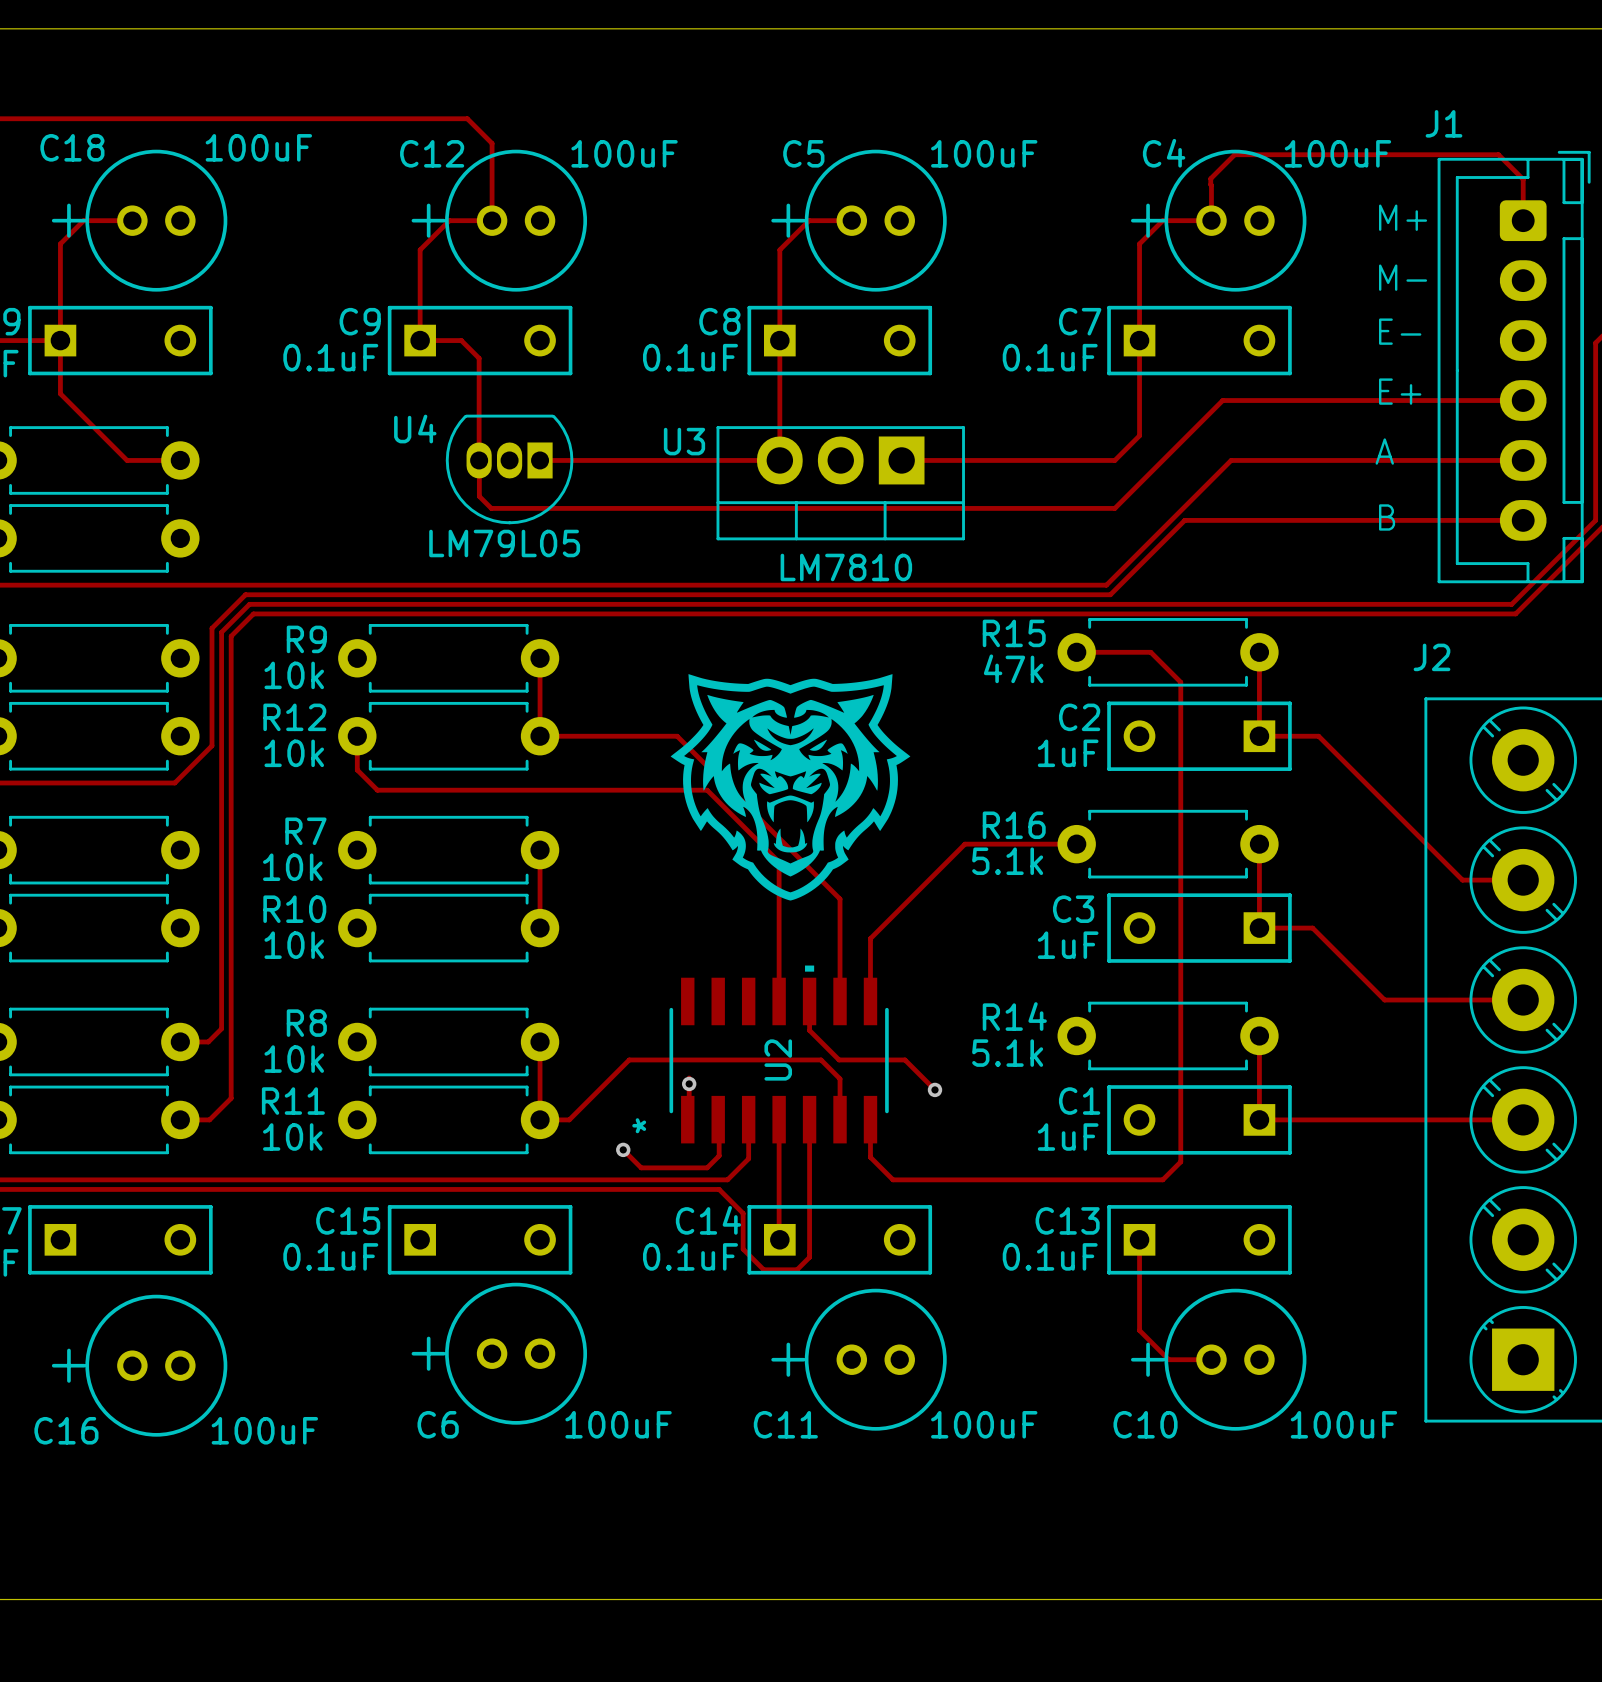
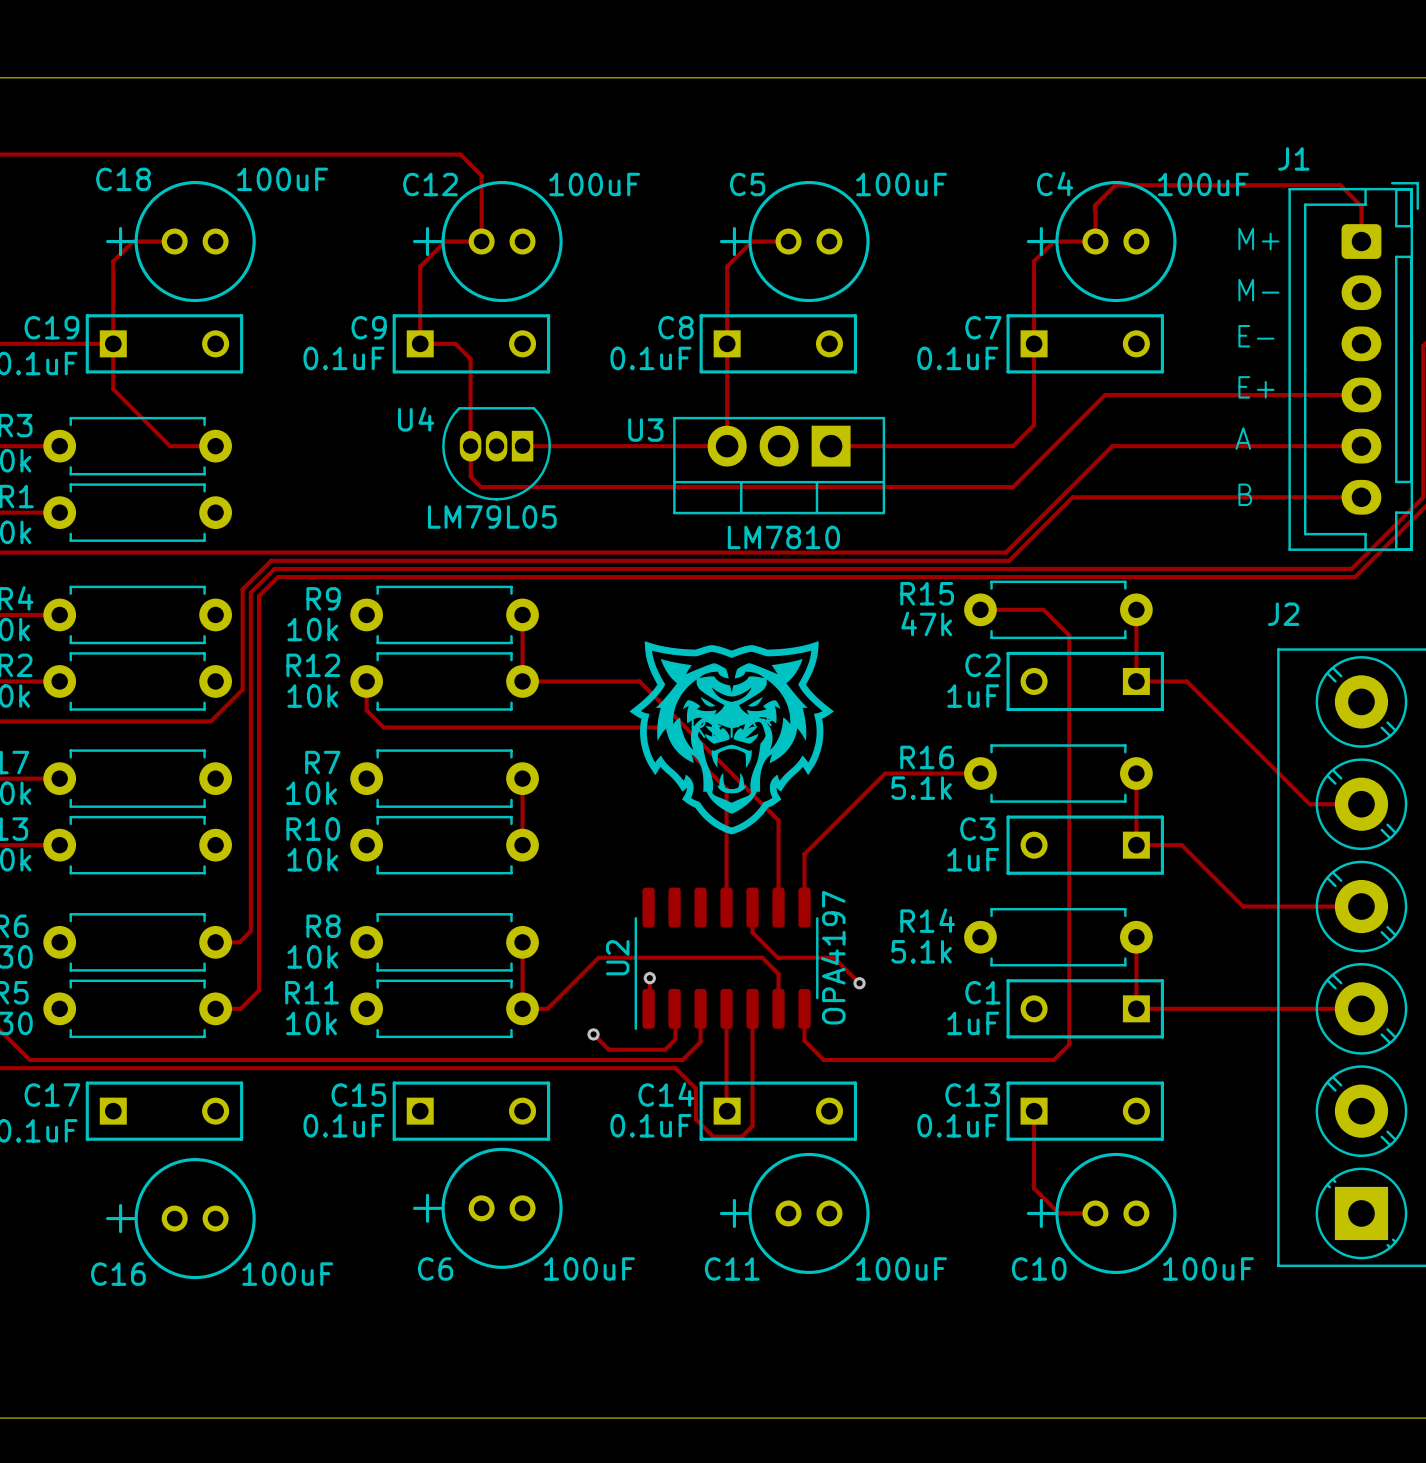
drawing: [670, 674, 911, 901] -> none
part: none -> (731, 737)
U2 footprint: [669, 965, 889, 1144] -> [634, 887, 819, 1031]
U2 name position: U2 (778, 1059) -> U2 (617, 957)
U2 value: none -> OPA4197 (833, 957)

